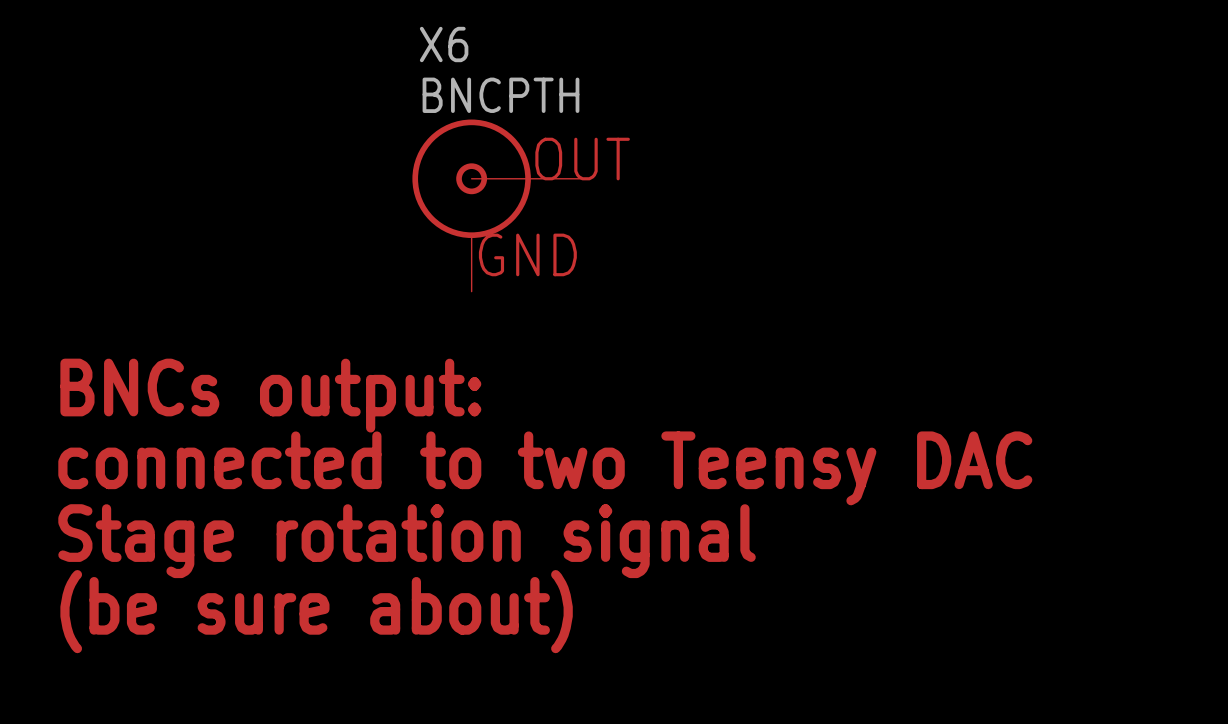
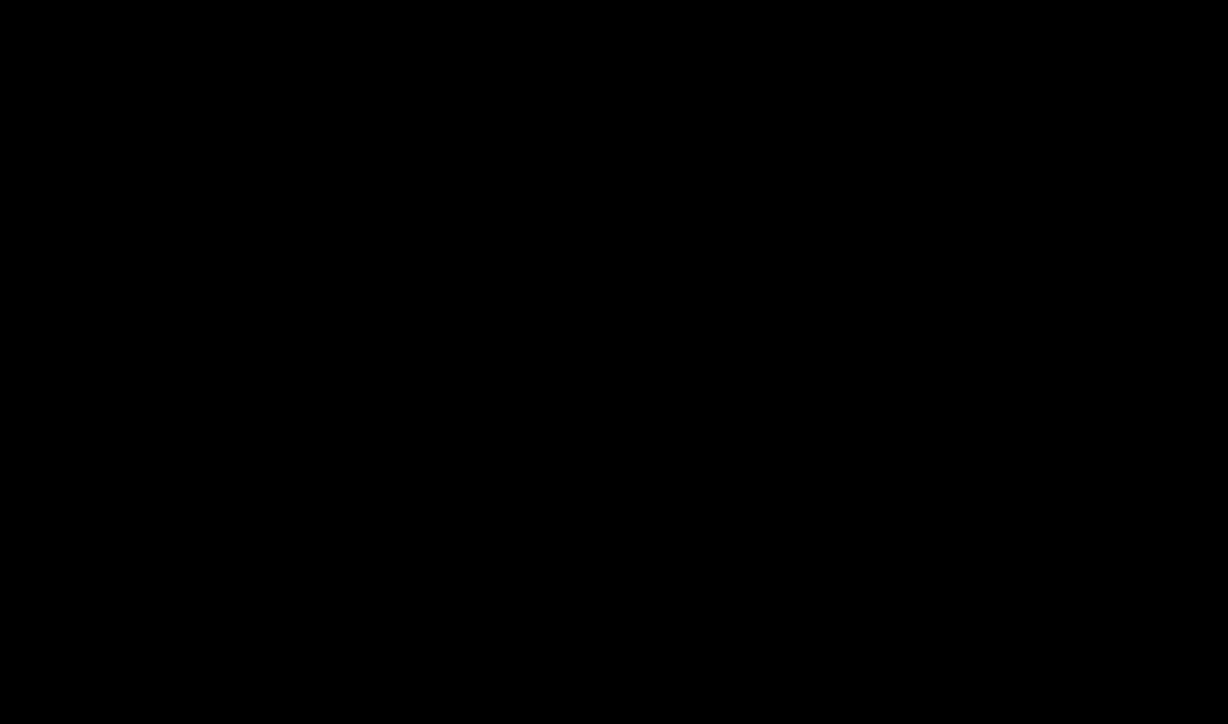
X6: BNCPTH (498, 205) -> none
text: BNCs output: (270, 395) -> none
text: connected to two Teensy DAC (545, 468) -> none
text: Stage rotation signal (407, 541) -> none
text: (be sure about) (316, 611) -> none

